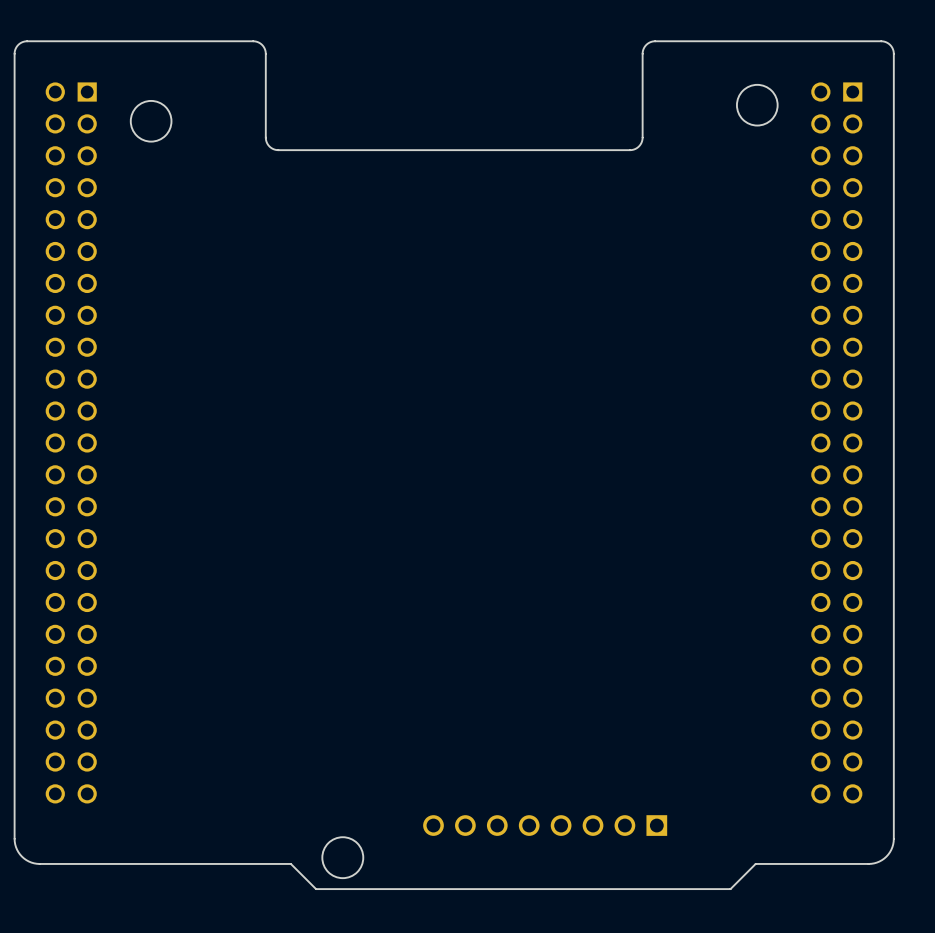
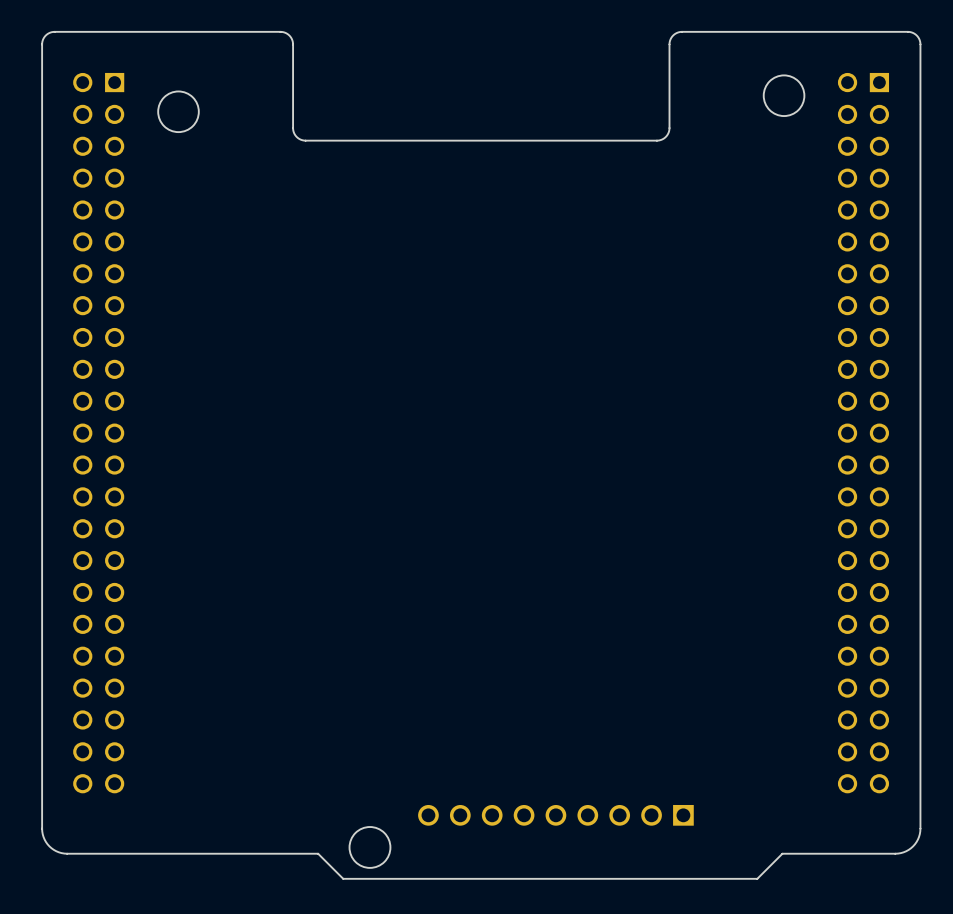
part: none -> (555, 815)
part: (545, 825) -> none

